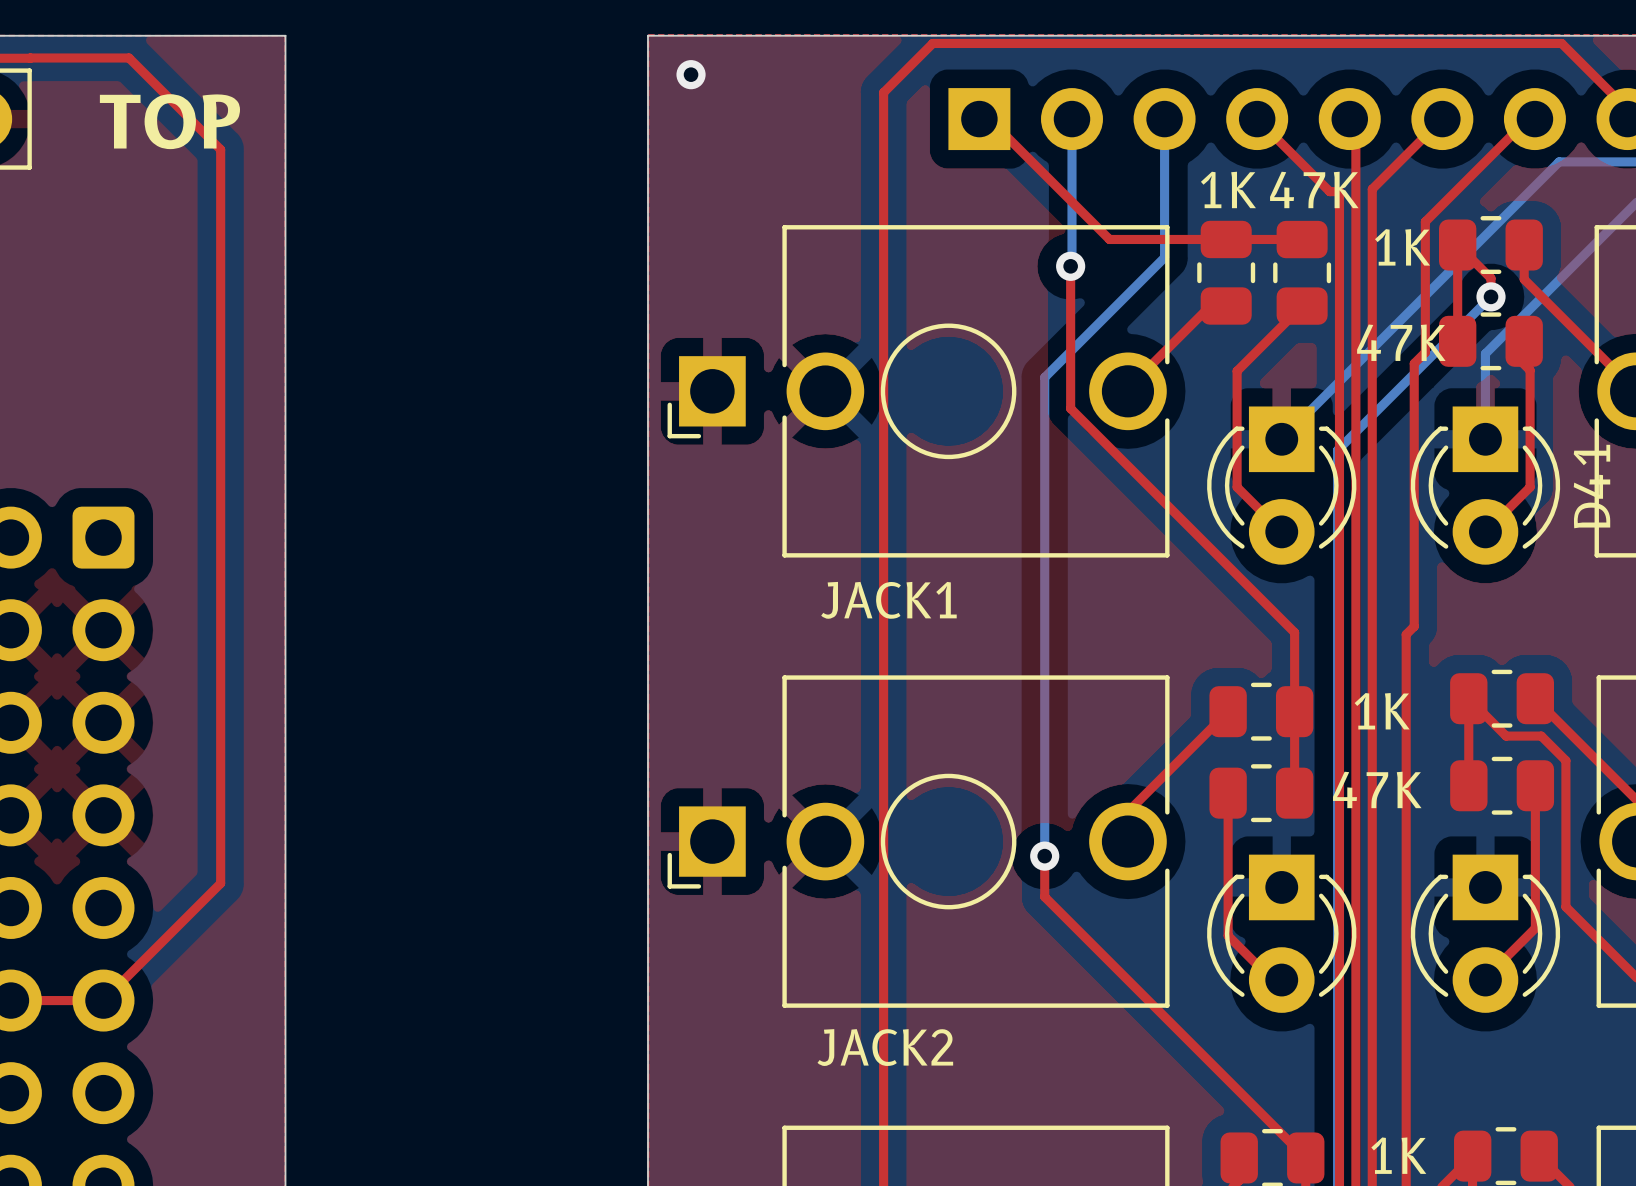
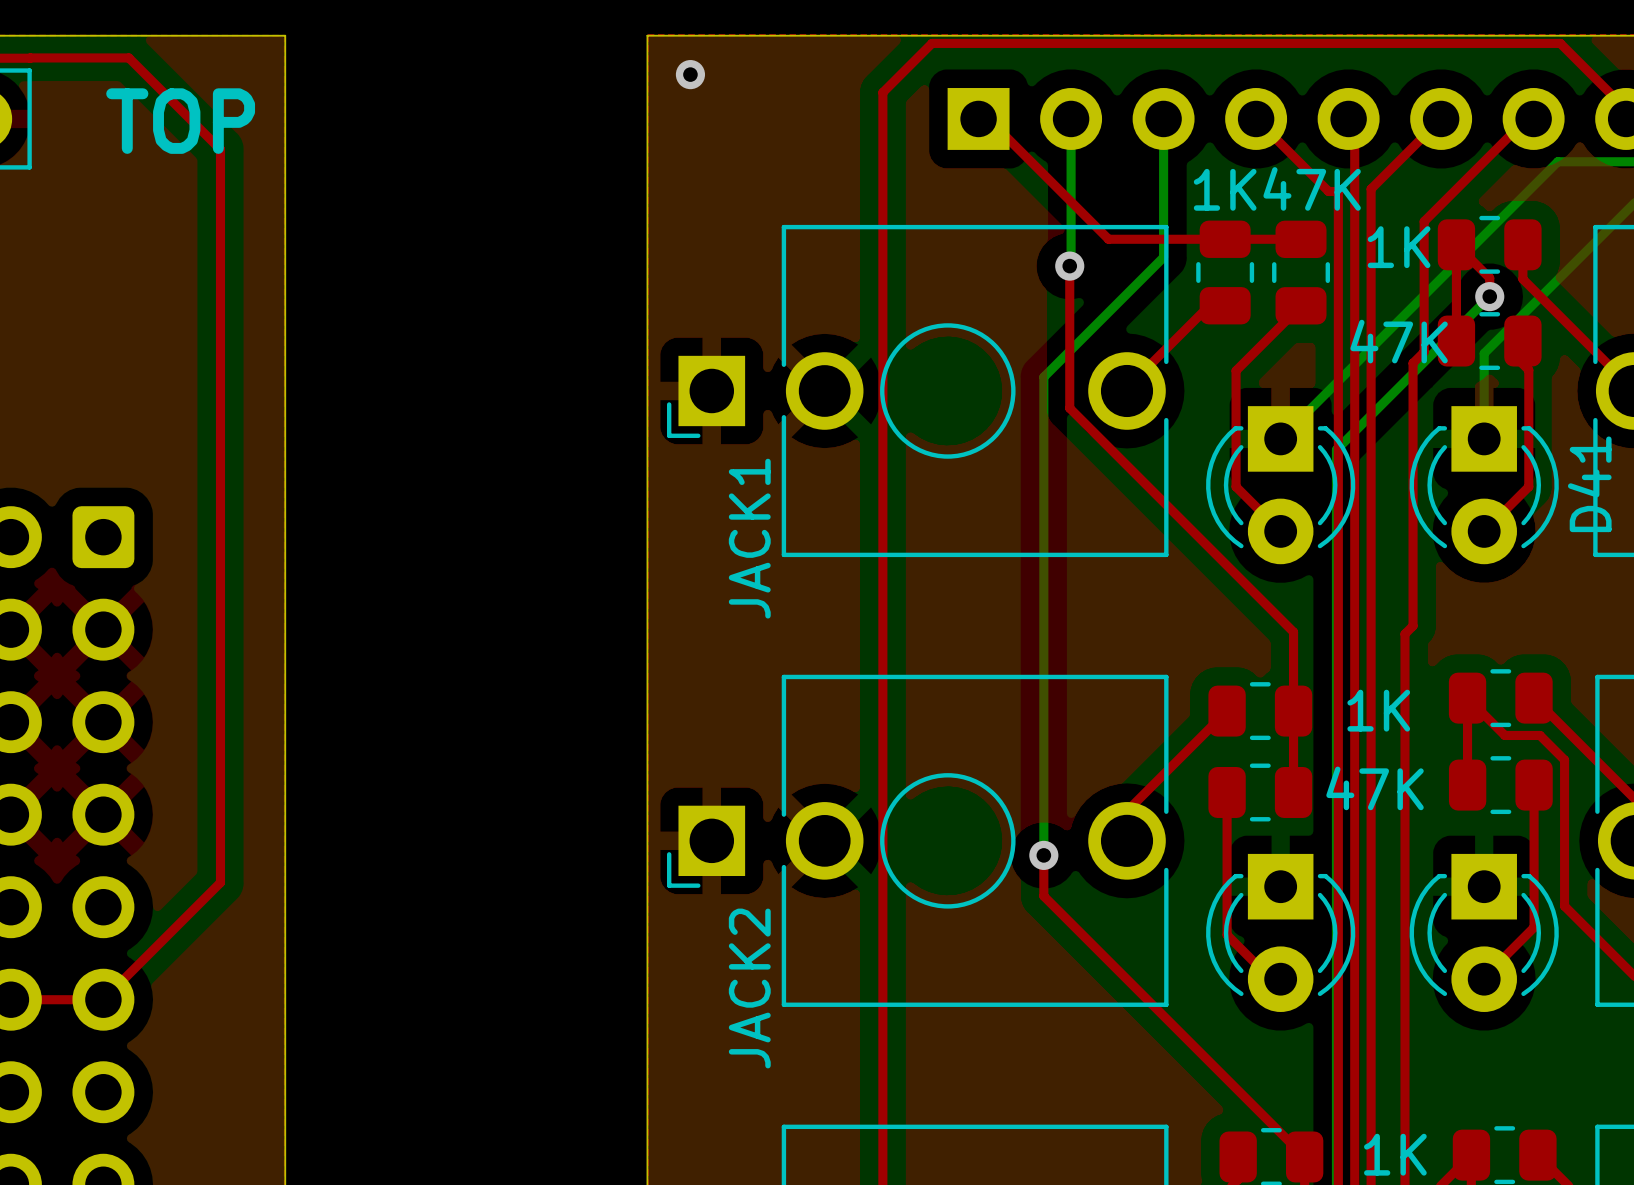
JACK1 name rotation: 0° (888, 600) -> 90° counterclockwise (749, 538)
JACK2 name rotation: 0° (885, 1047) -> 90° counterclockwise (749, 988)

